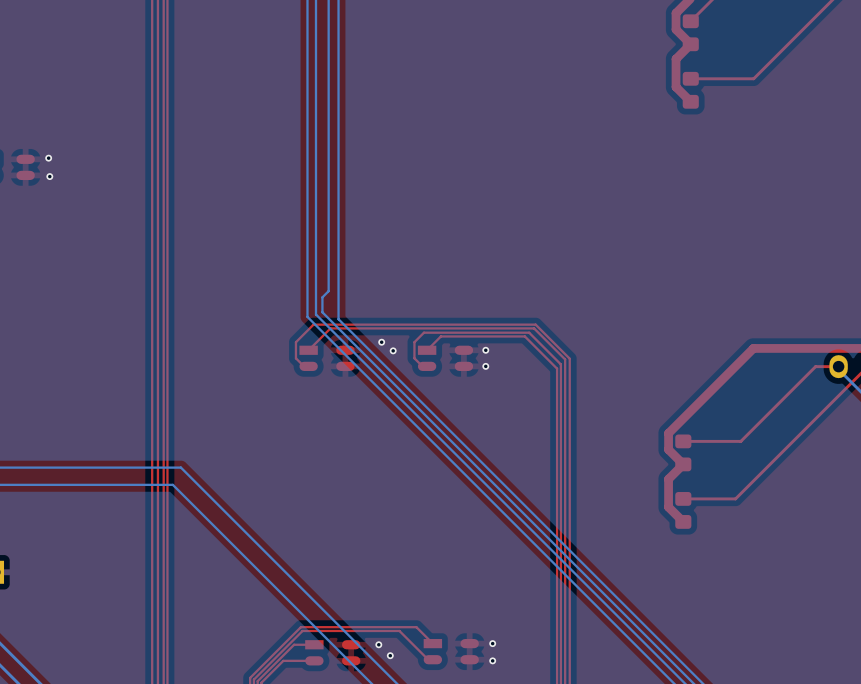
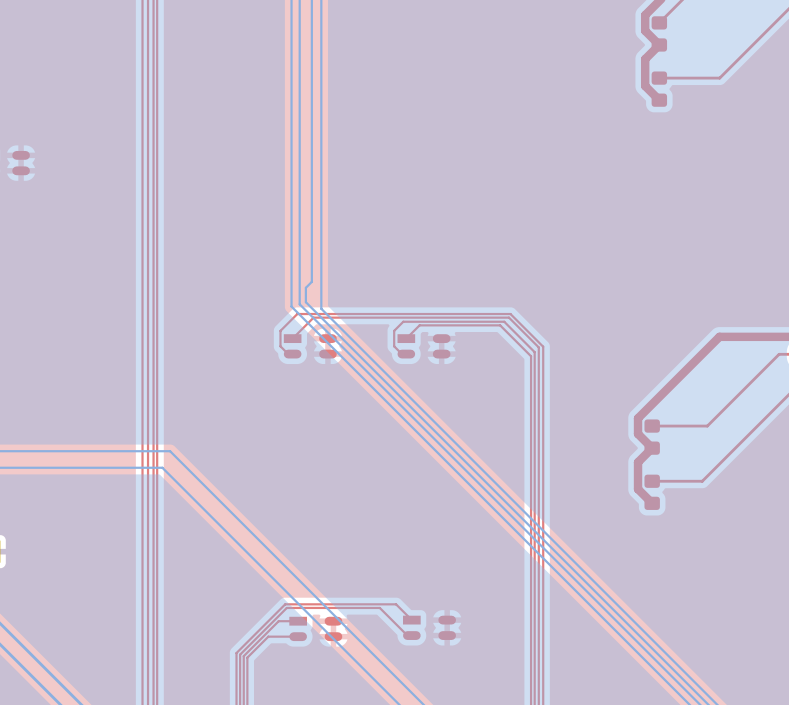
via: (48, 158) -> none
via: (49, 176) -> none
via: (381, 342) -> none
via: (393, 350) -> none
via: (485, 350) -> none
via: (485, 366) -> none
via: (492, 643) -> none
via: (378, 644) -> none
via: (390, 655) -> none
via: (492, 660) -> none

